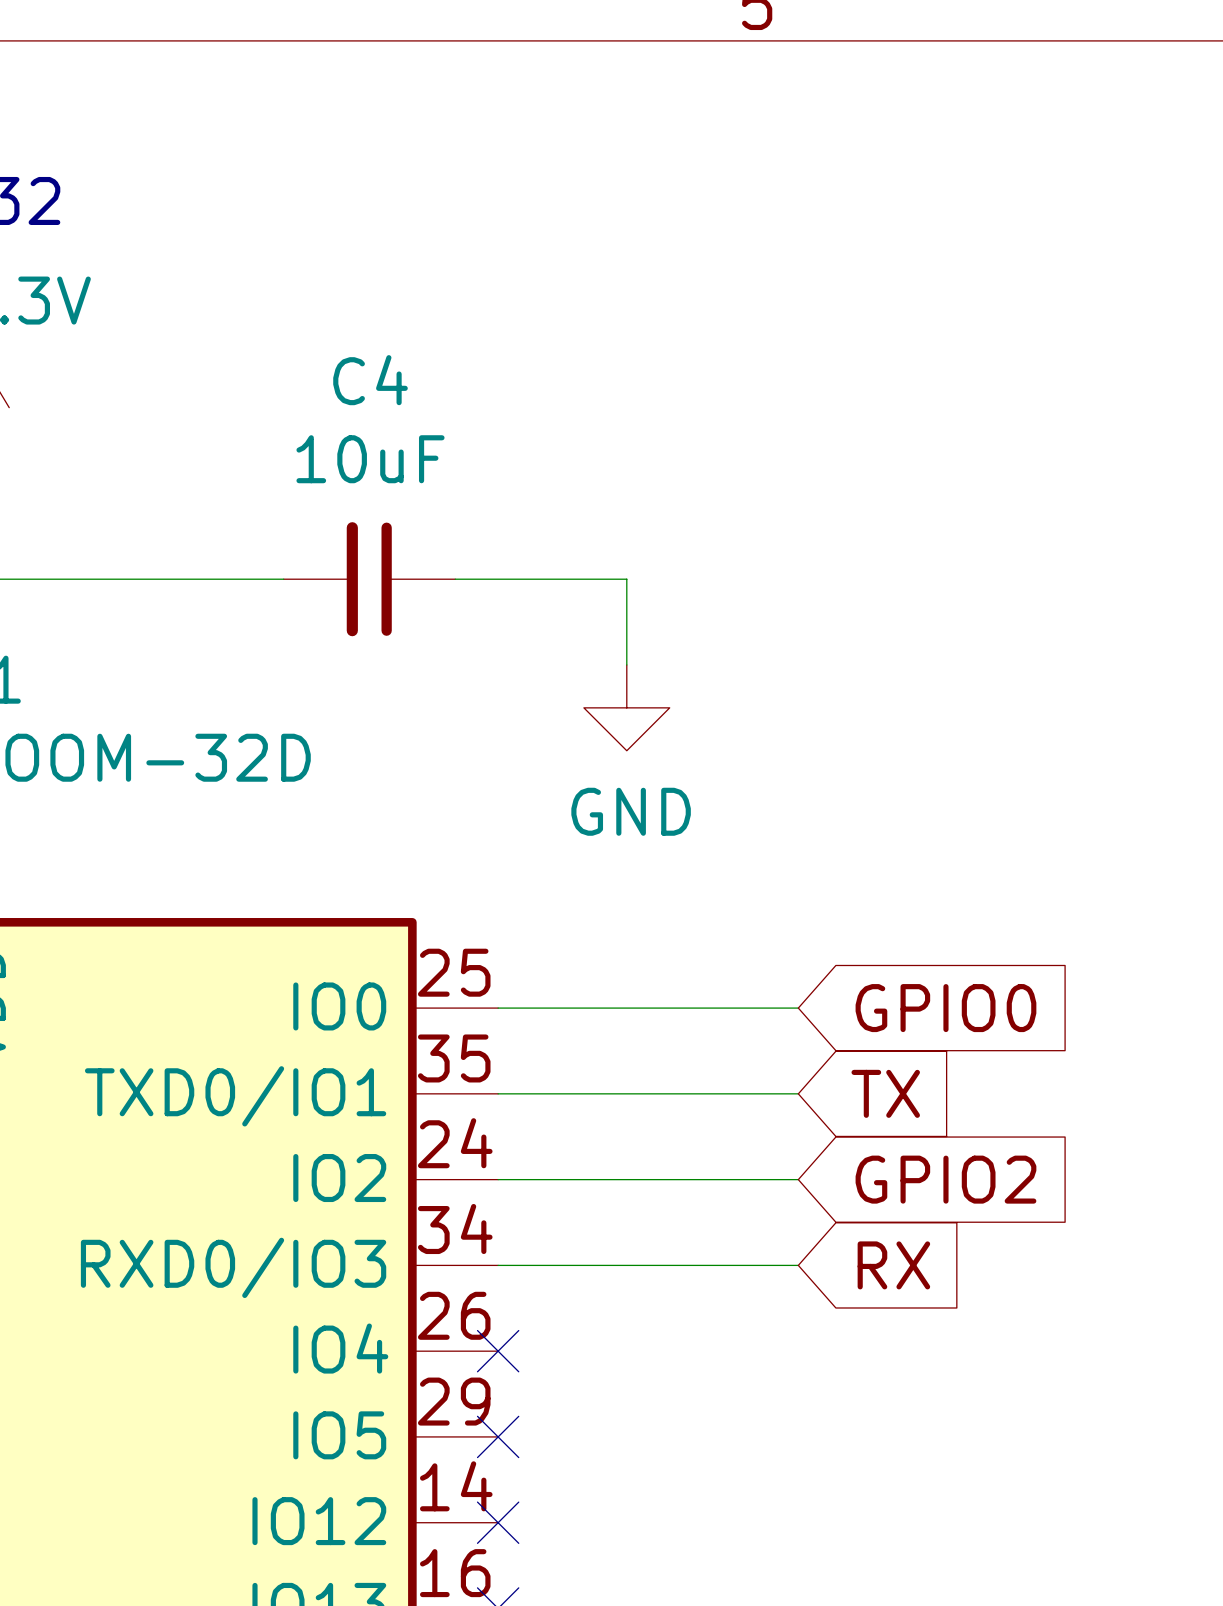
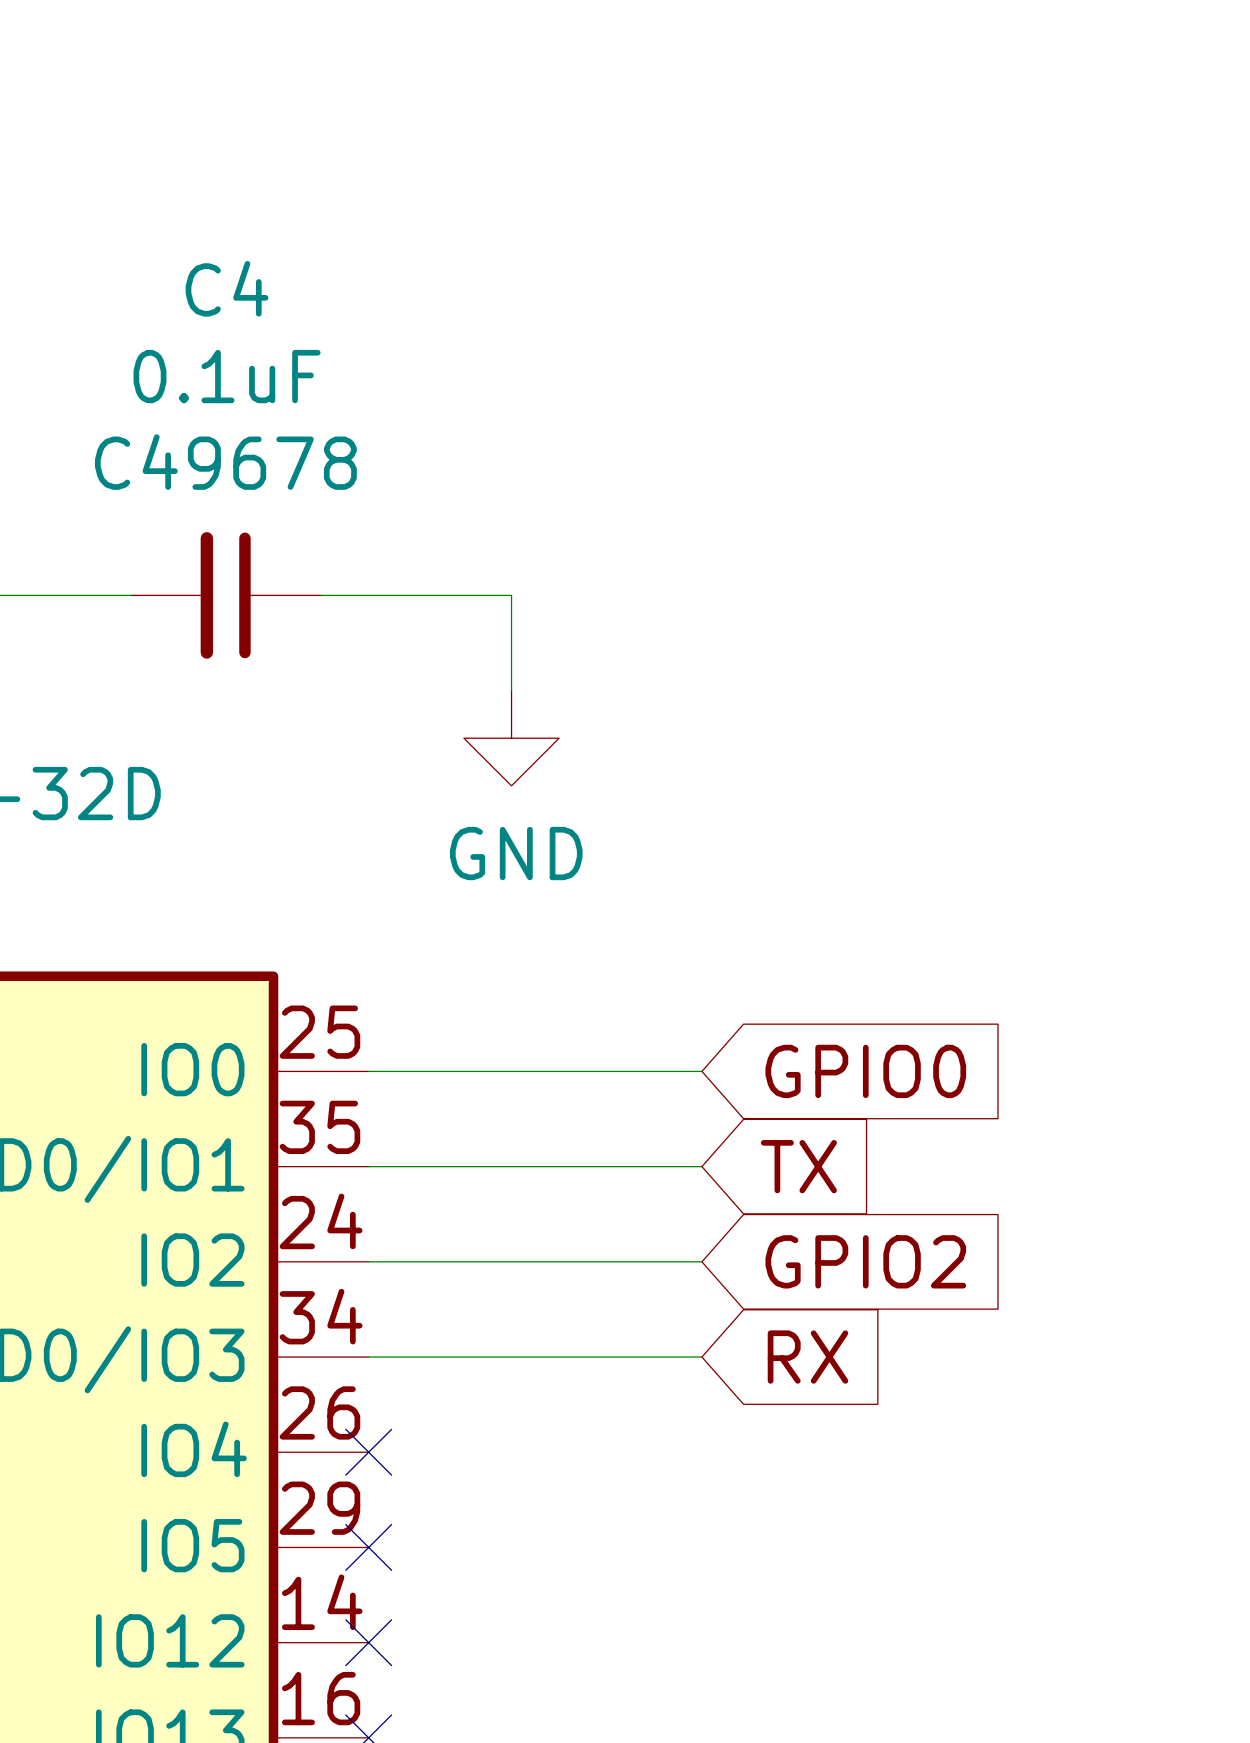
C4 name position: C4 (370, 380) -> C4 (227, 288)
C4 text: none -> C49678 (225, 462)
C4 value: 10uF (370, 459) -> 0.1uF (227, 376)

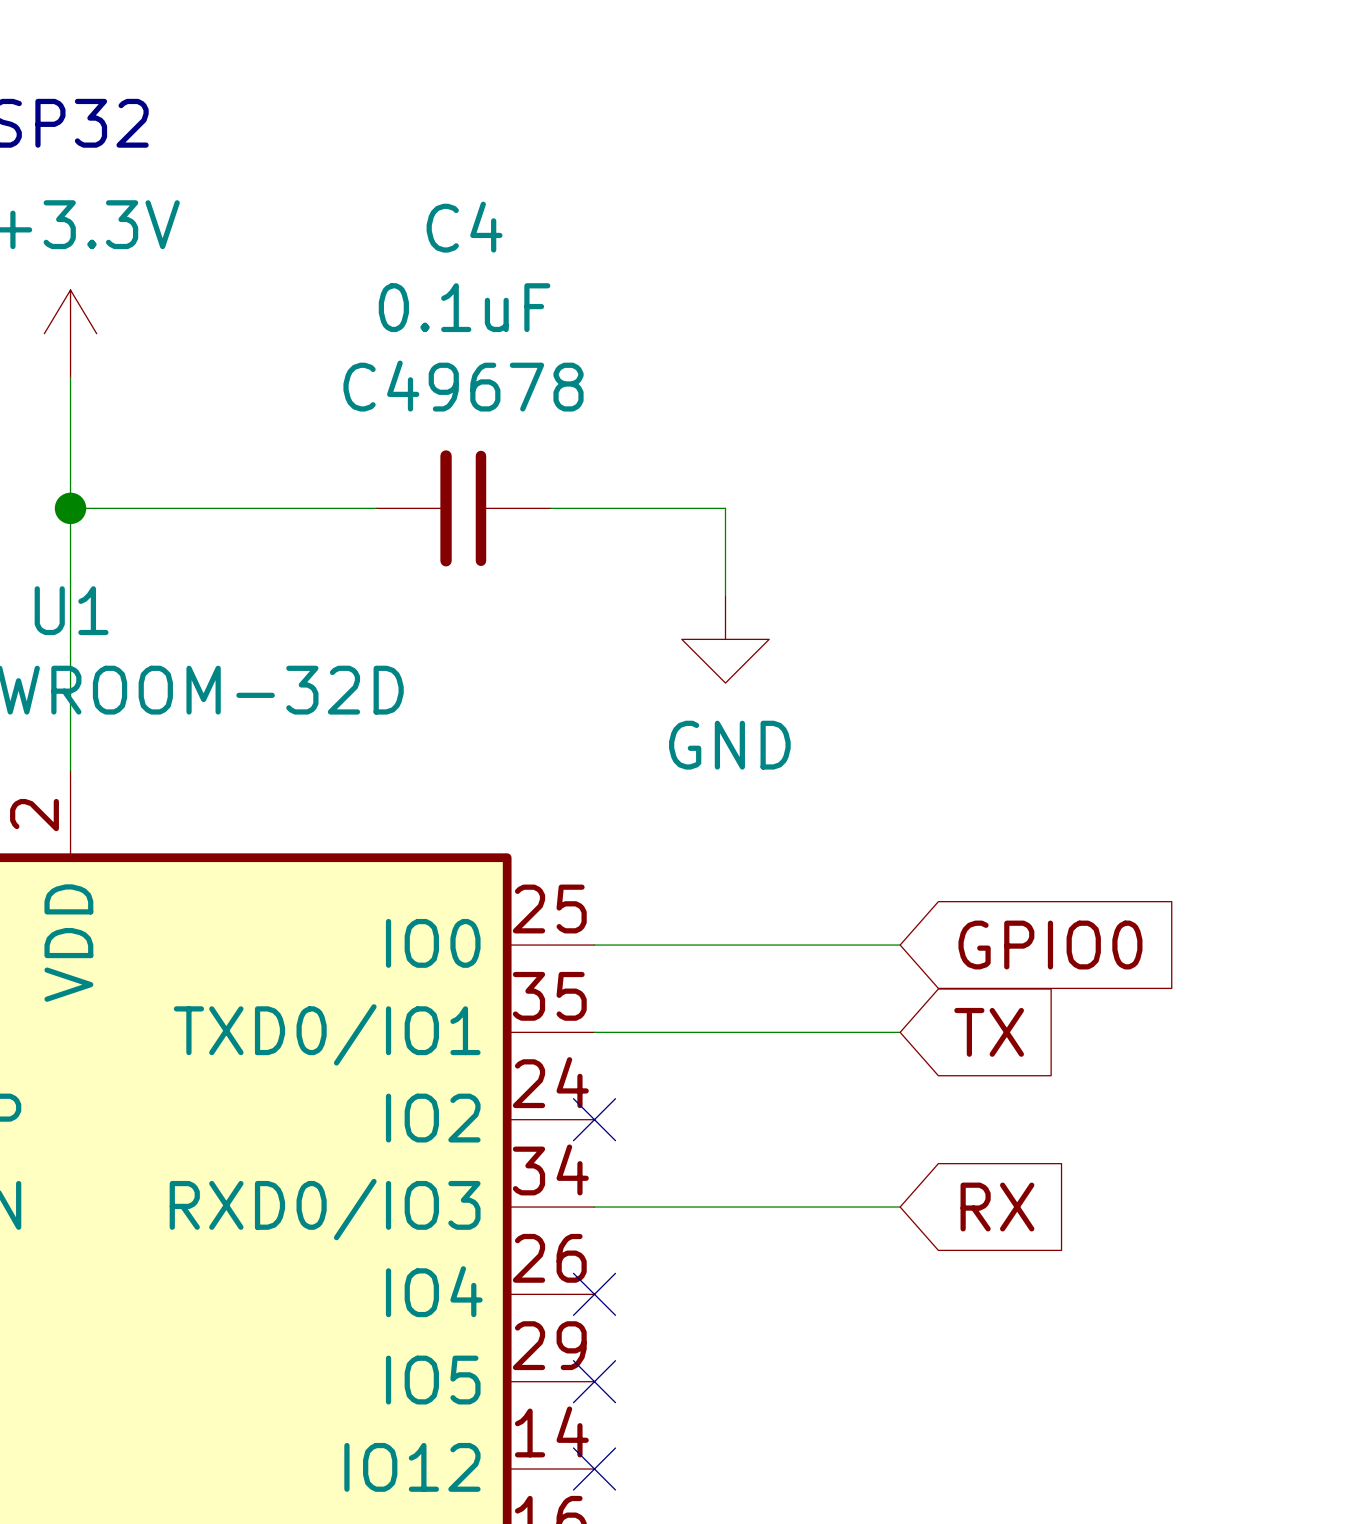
wire: (368, 1261) (701, 1261) -> none
no-connect mark: none -> (594, 1119)
global label: GPIO2 (865, 1261) -> none

